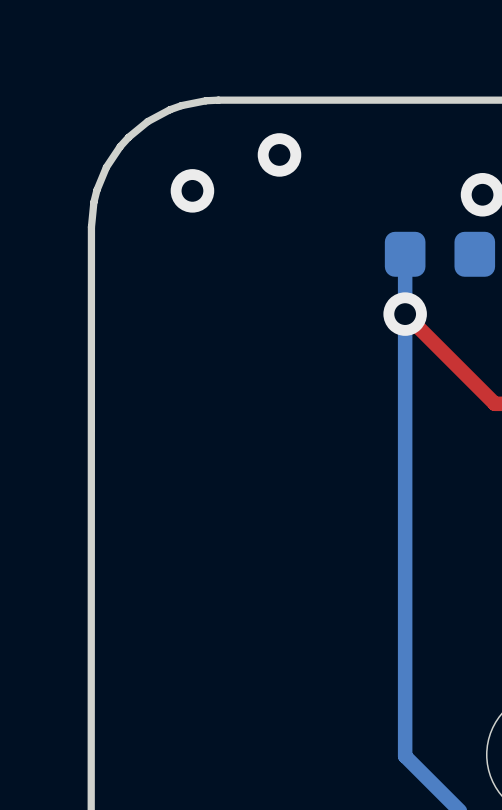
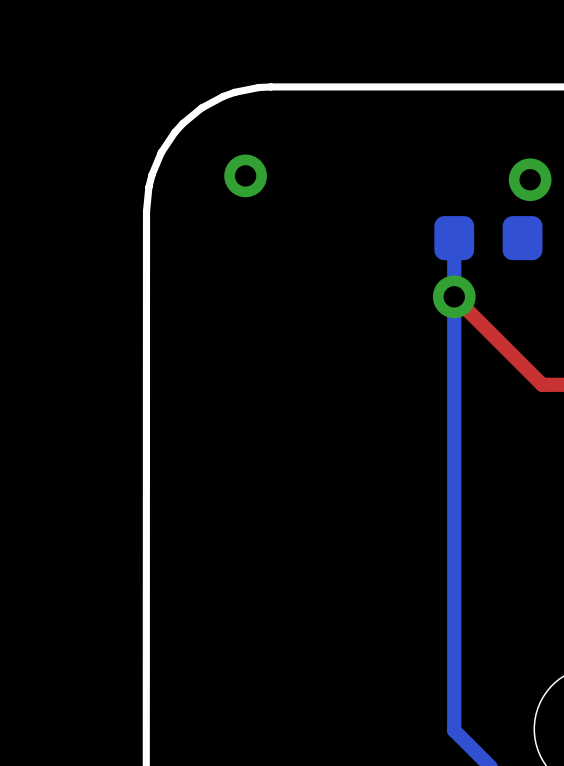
via: (279, 154) -> none

